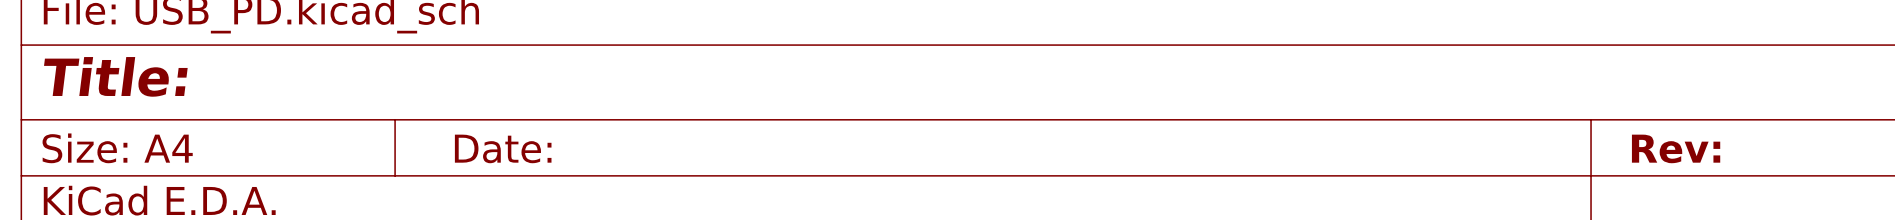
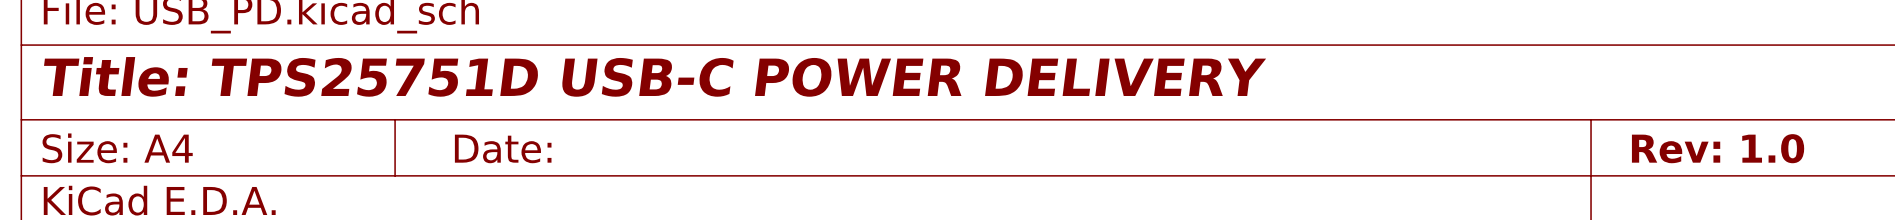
title block: Title: (115, 76) -> Title: TPS25751D USB-C POWER DELIVERY (655, 76)
title block: Rev: (1676, 148) -> Rev: 1.0 (1718, 148)

